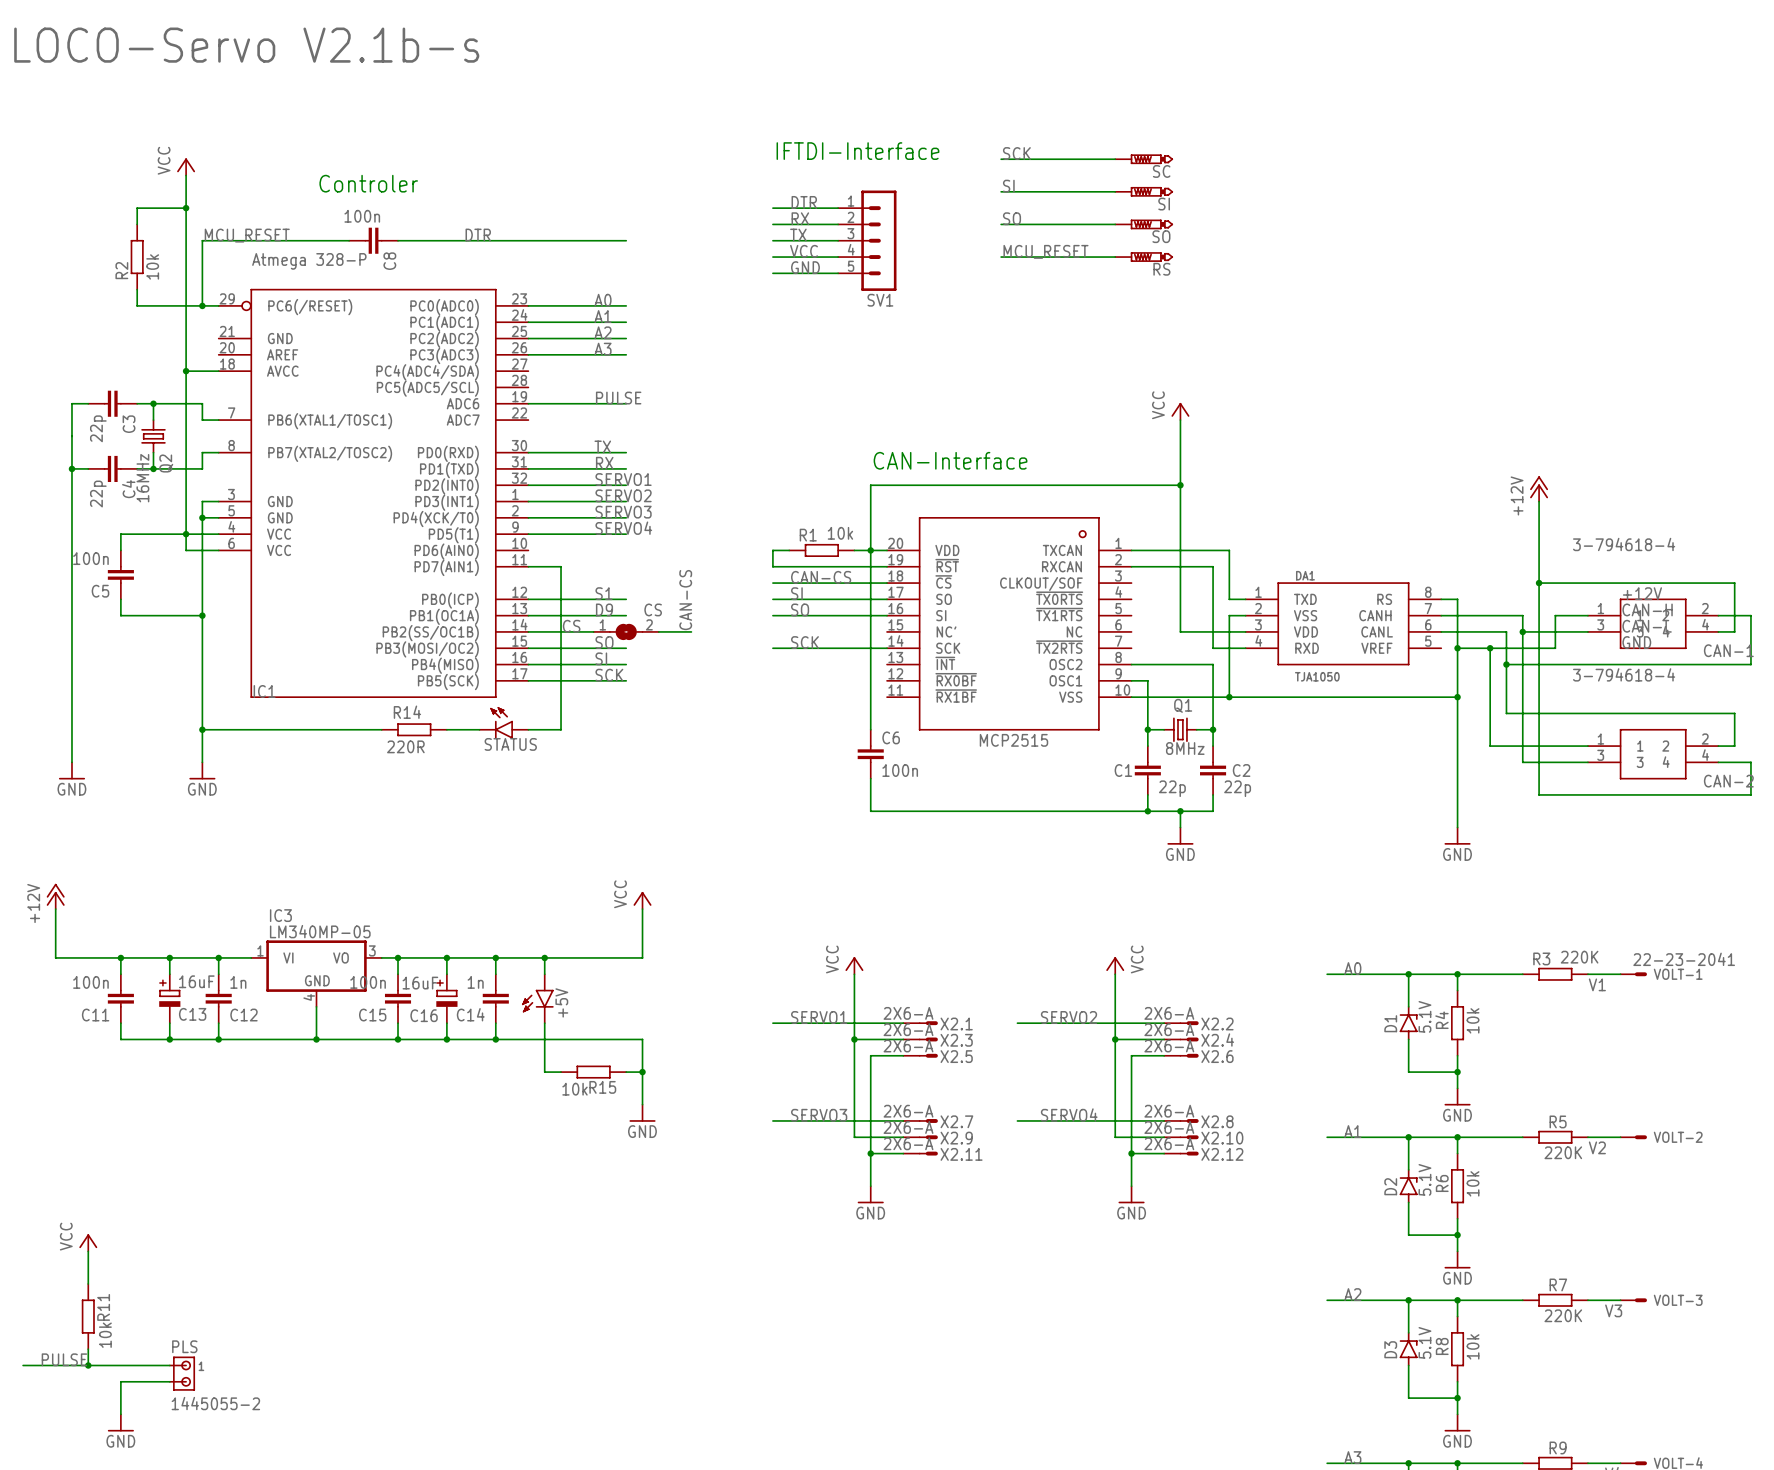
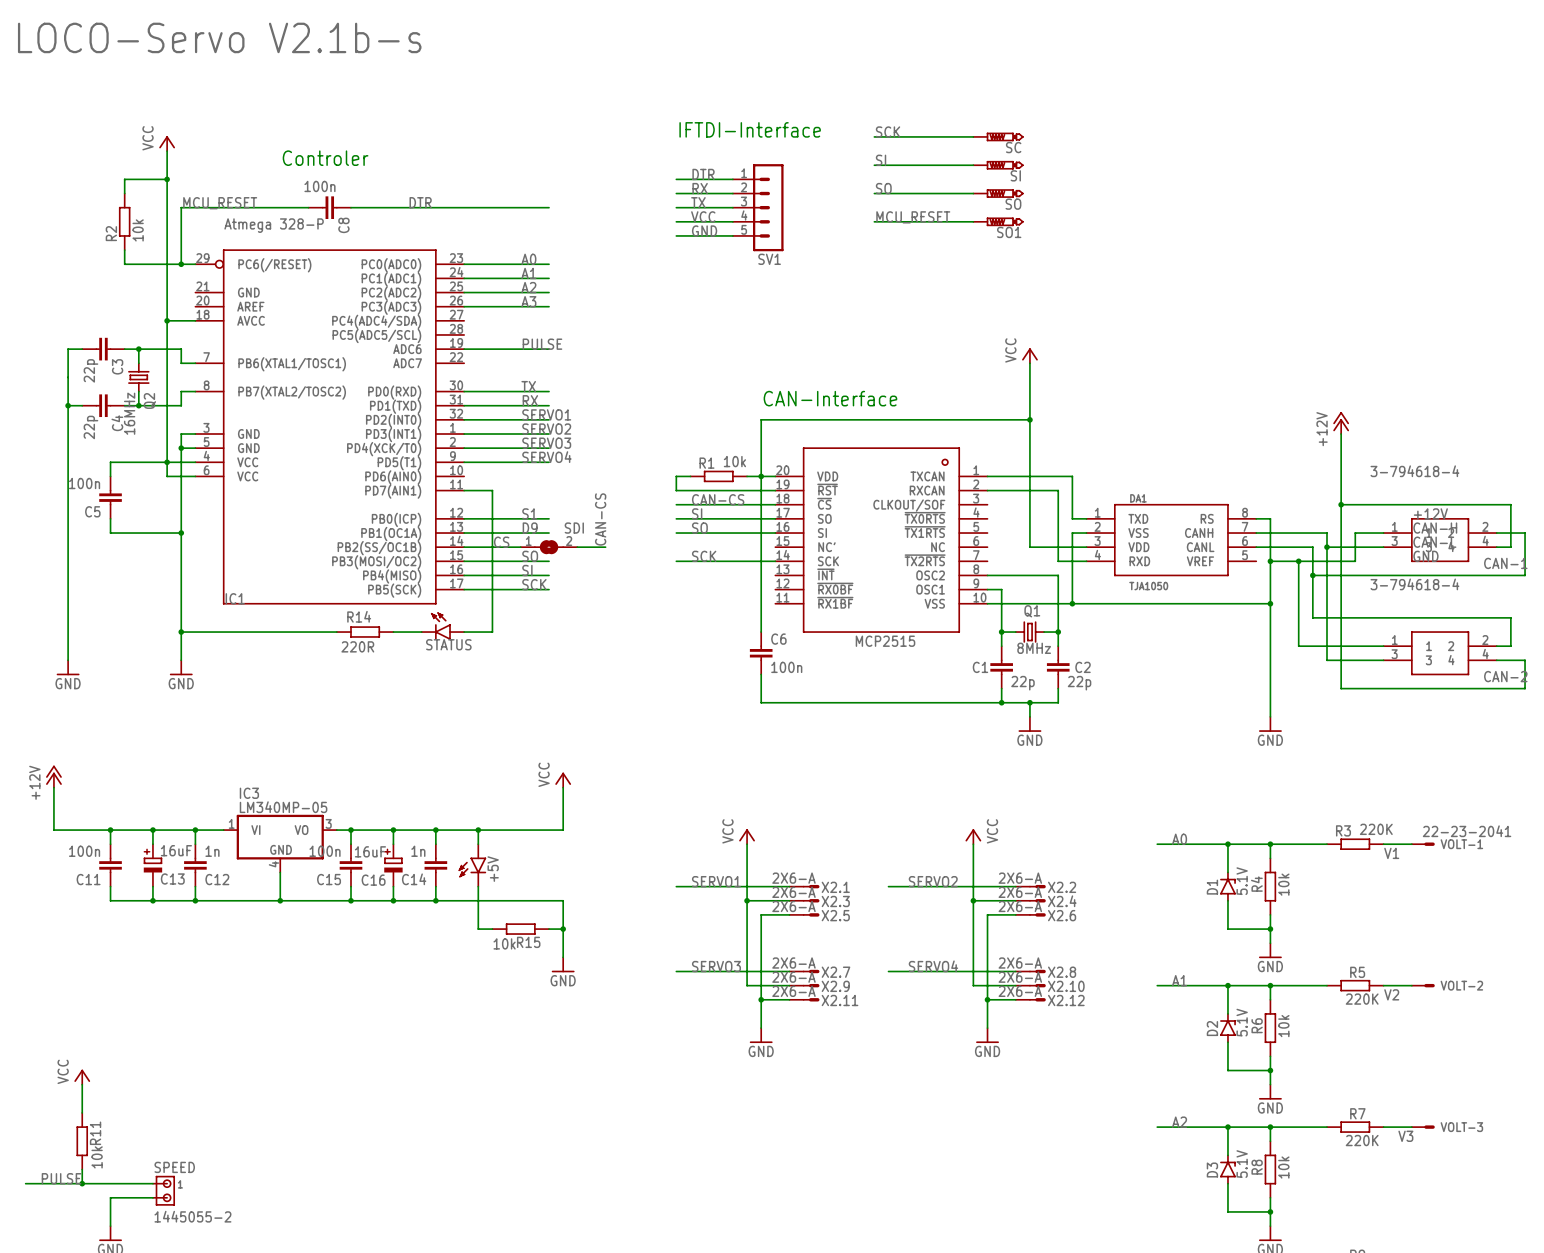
RS name: RS (1161, 269) -> SO1 (1009, 232)
CS name: CS (653, 609) -> SDI (574, 528)
PLS name: PLS (184, 1346) -> SPEED (174, 1167)

